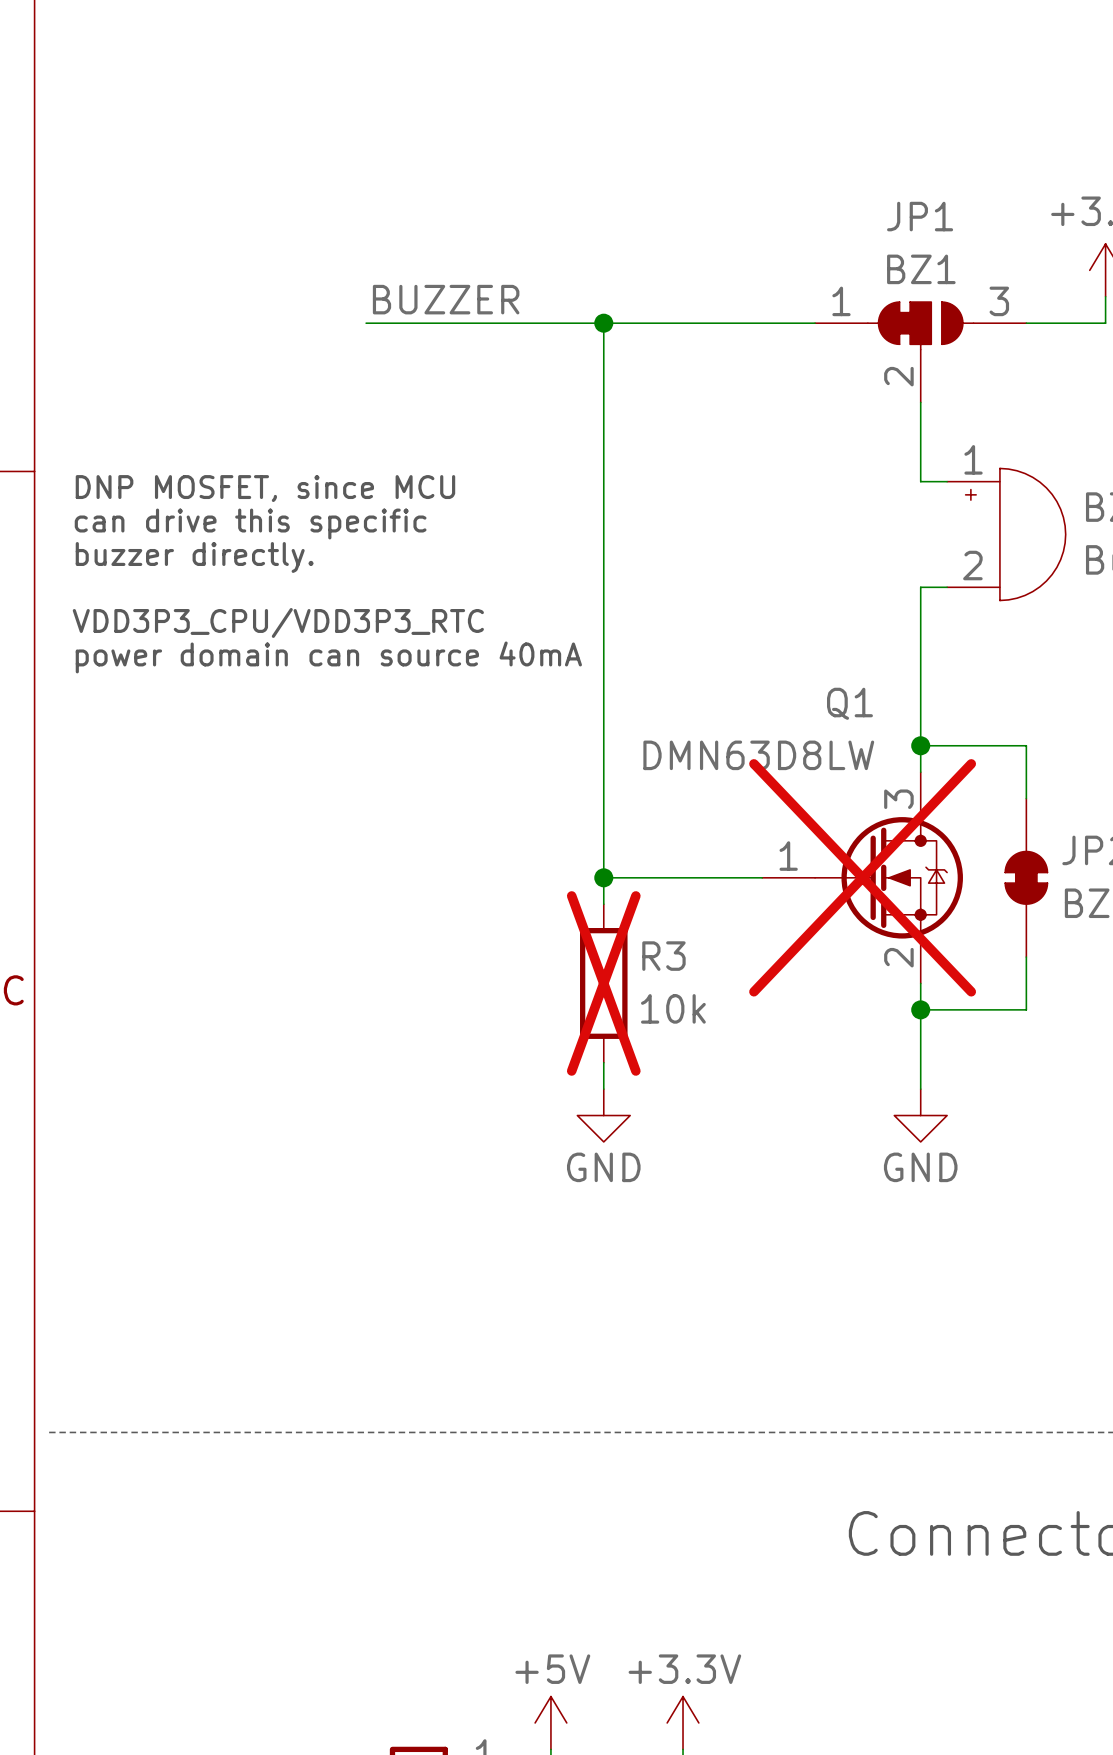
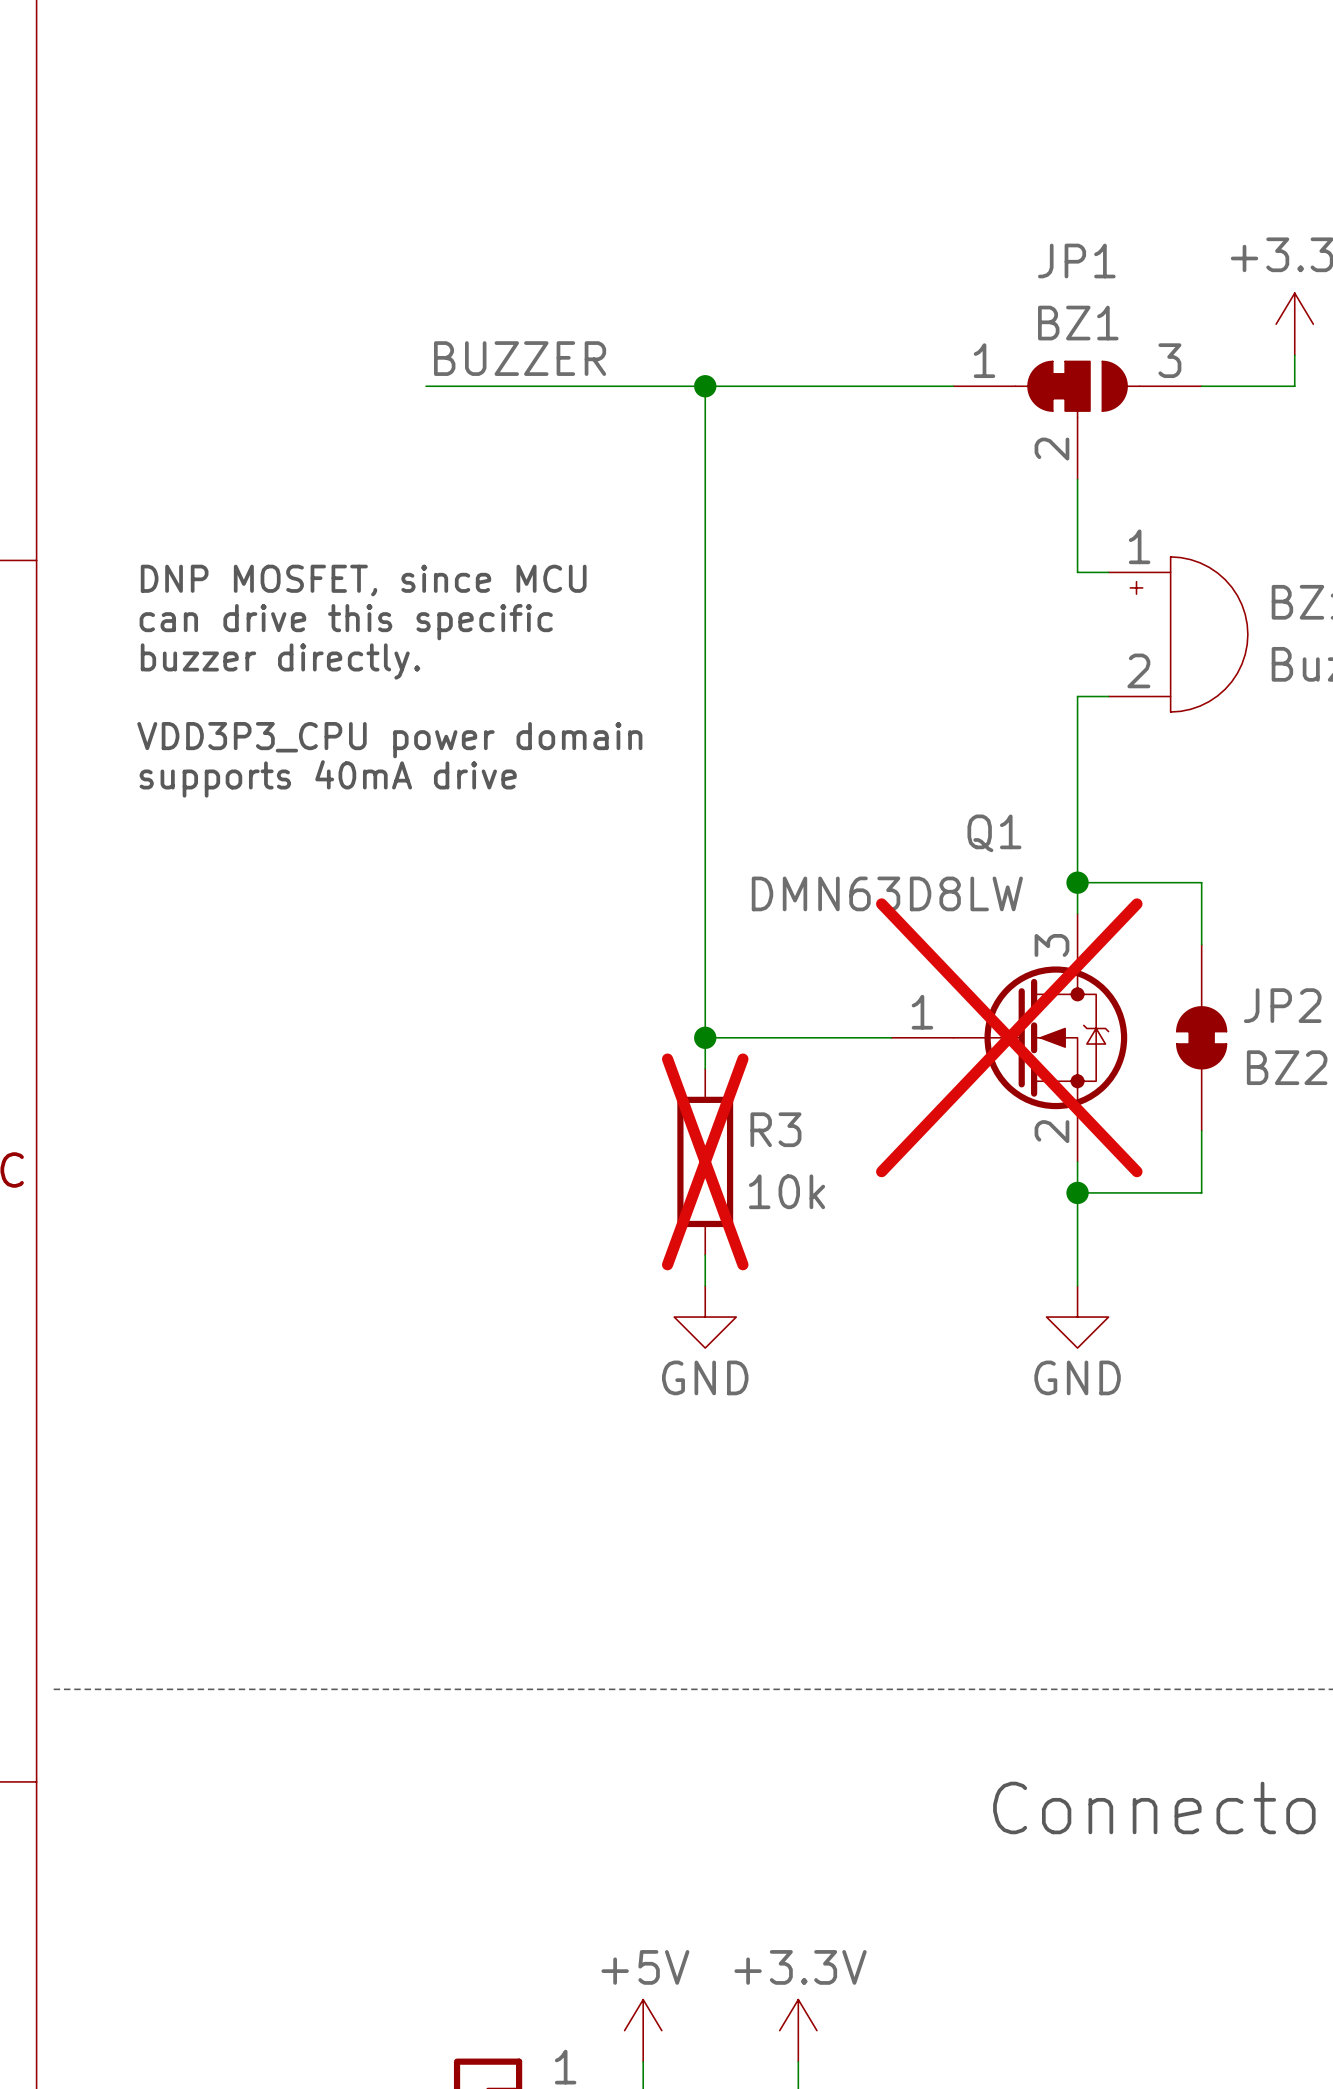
text position: DNP MOSFET, since MCU (265, 488) -> DNP MOSFET, since MCU (363, 580)
text position: can drive this specific (250, 524) -> can drive this specific (346, 622)
text position: buzzer directly. (194, 557) -> buzzer directly. (280, 661)
text: VDD3P3_CPU/VDD3P3_RTC (278, 622) -> none
text: none -> VDD3P3_CPU power domain (389, 740)
text: none -> supports 40mA drive (328, 778)
text: power domain can source 40mA (328, 657) -> none

